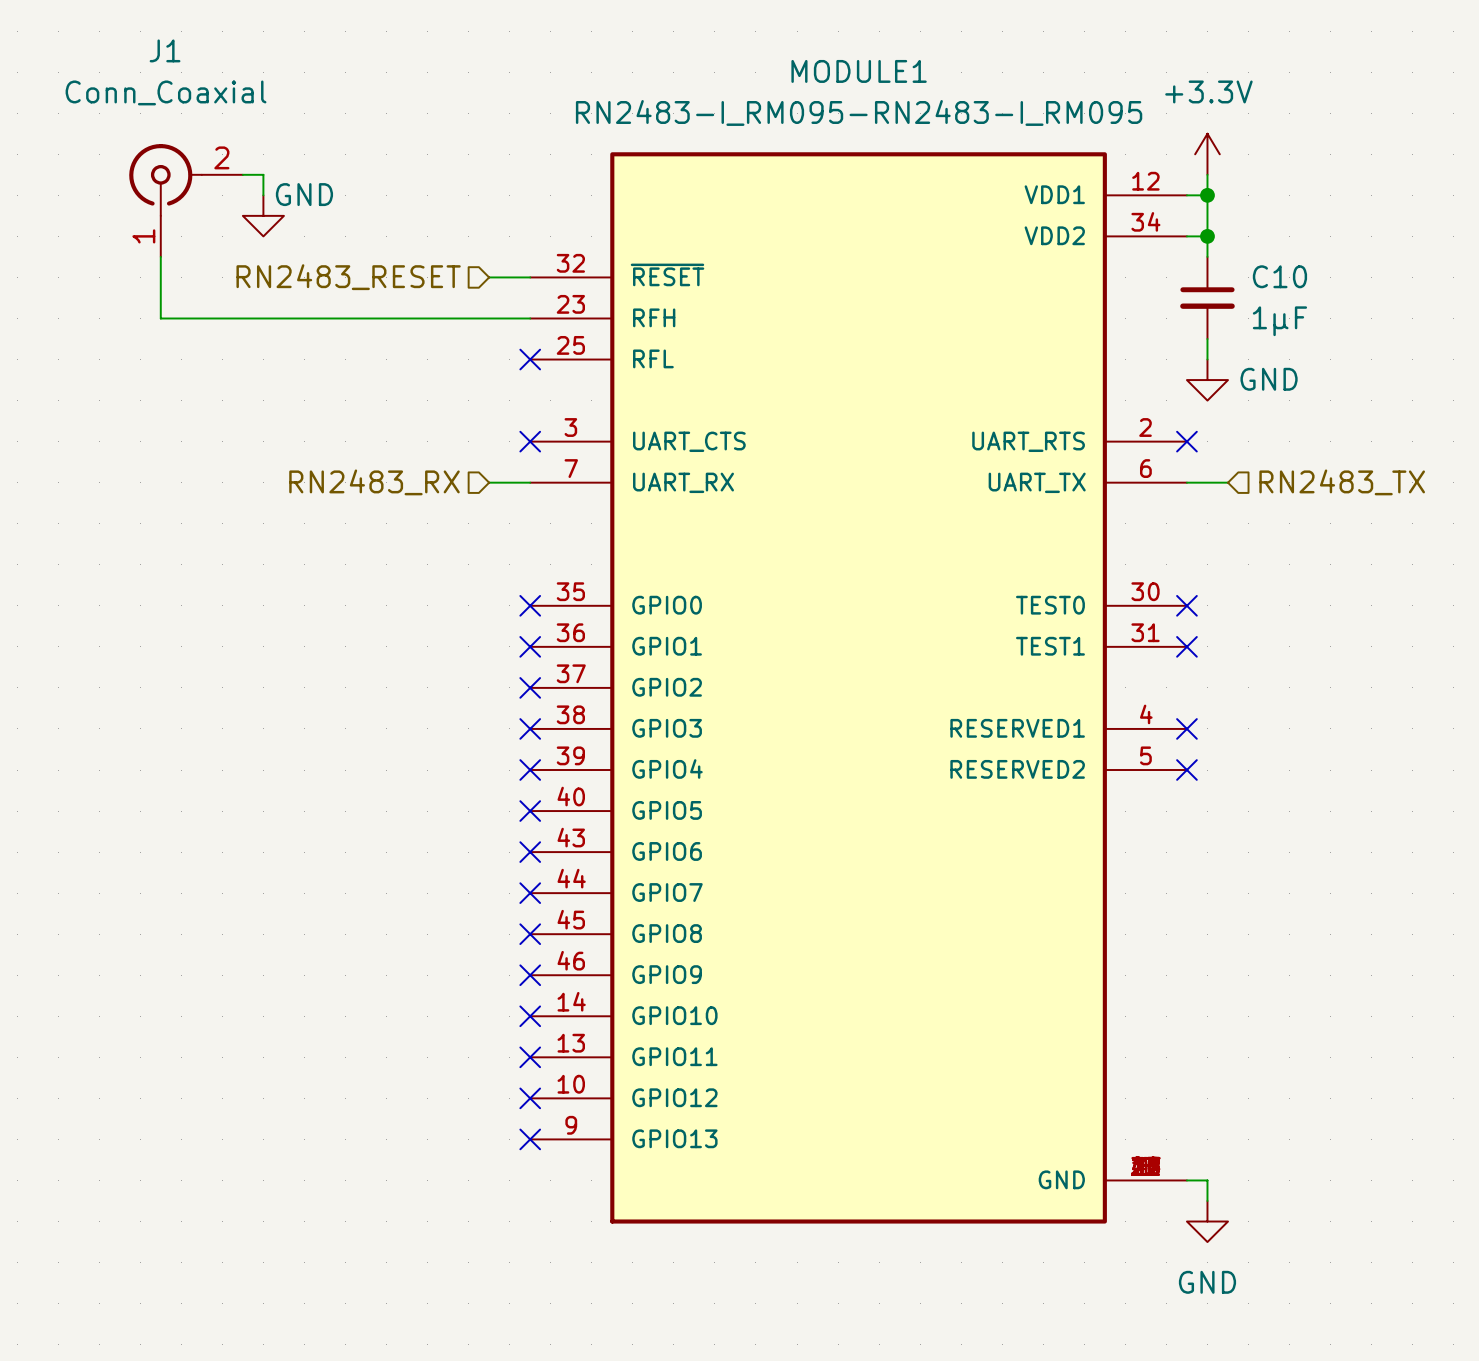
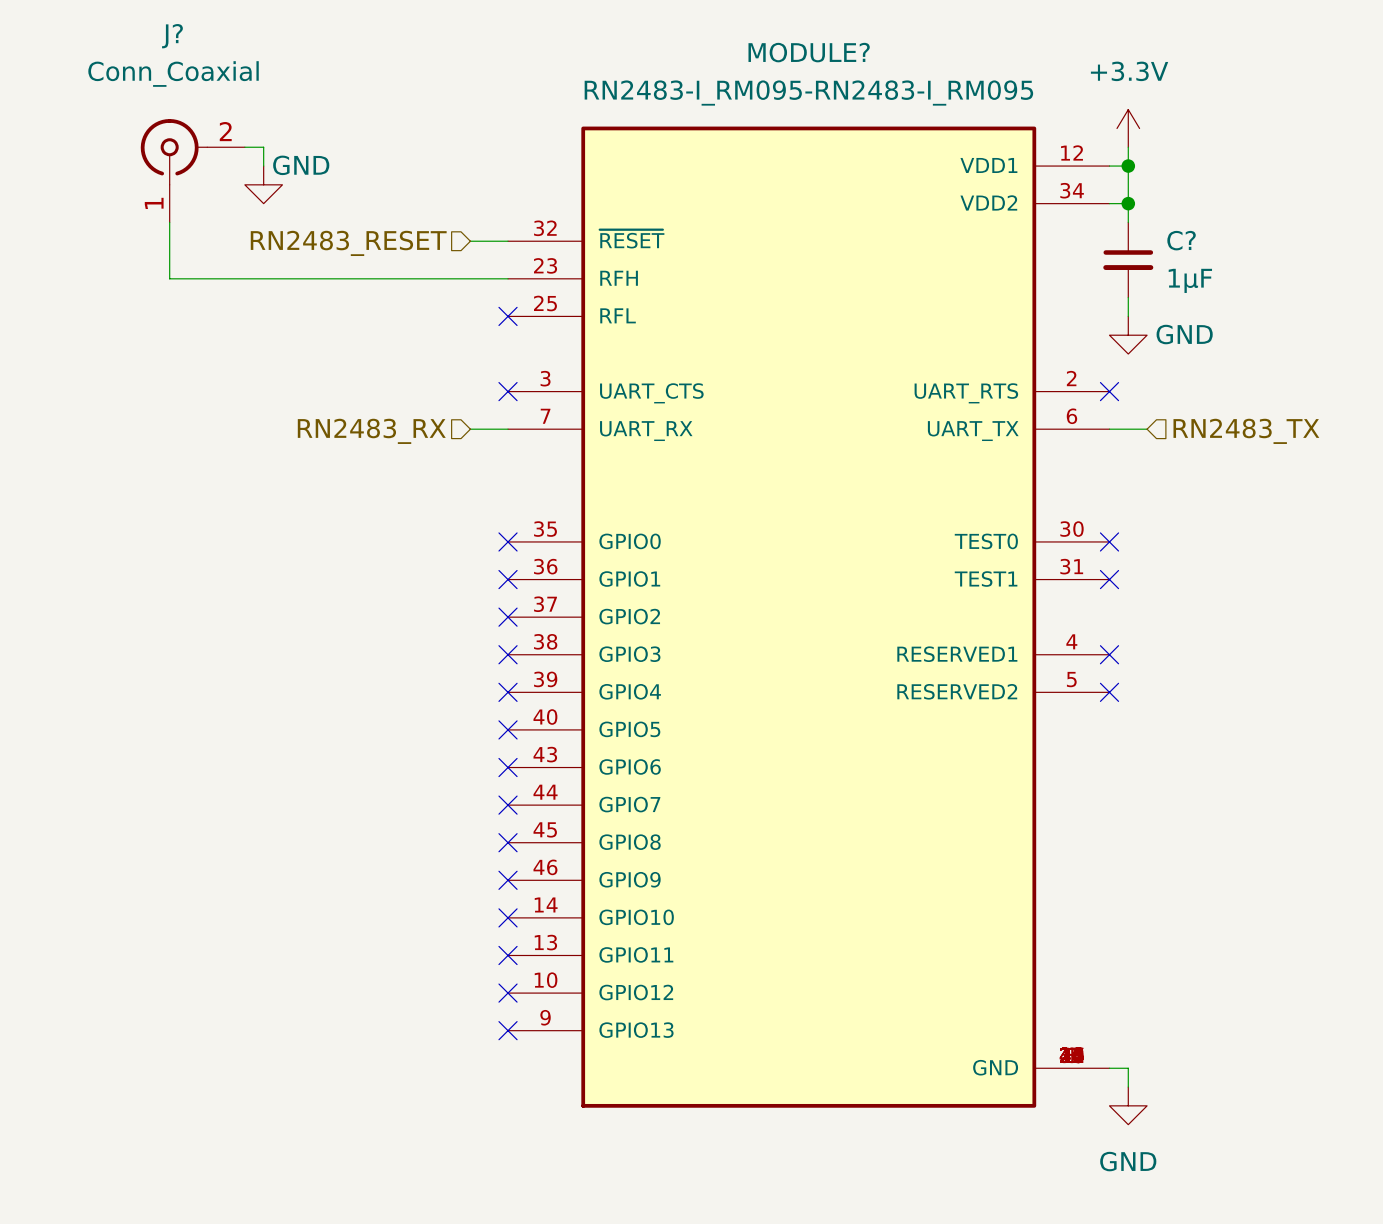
J1 name: J1 (165, 50) -> J? (172, 36)
MODULE1 name: MODULE1 (859, 71) -> MODULE? (809, 52)
C10 name: C10 (1279, 276) -> C? (1181, 240)

